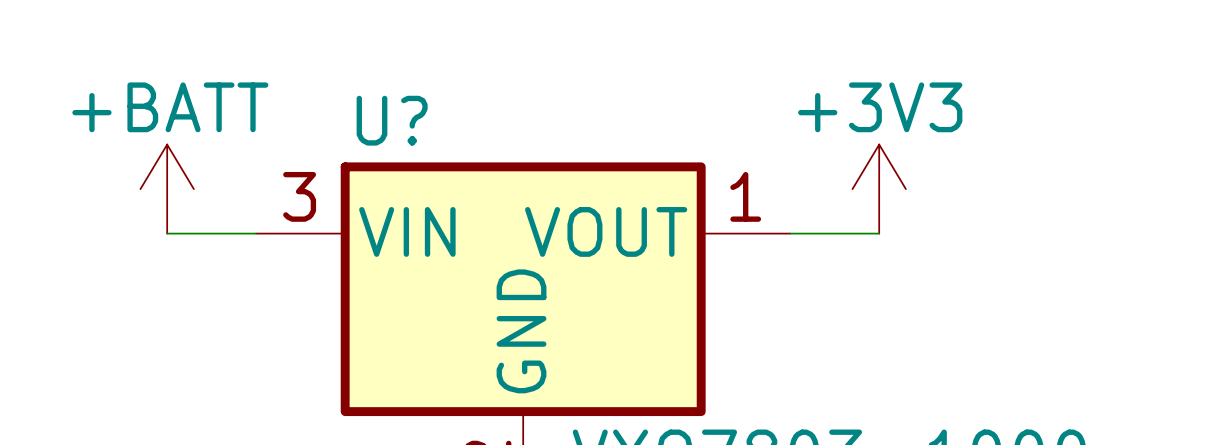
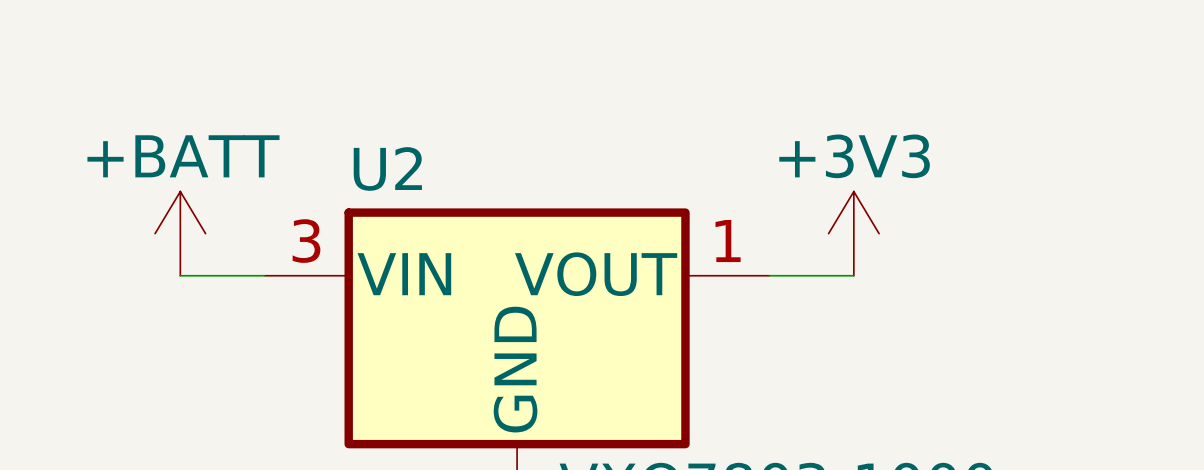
U? name: U? (392, 120) -> U2 (387, 168)

